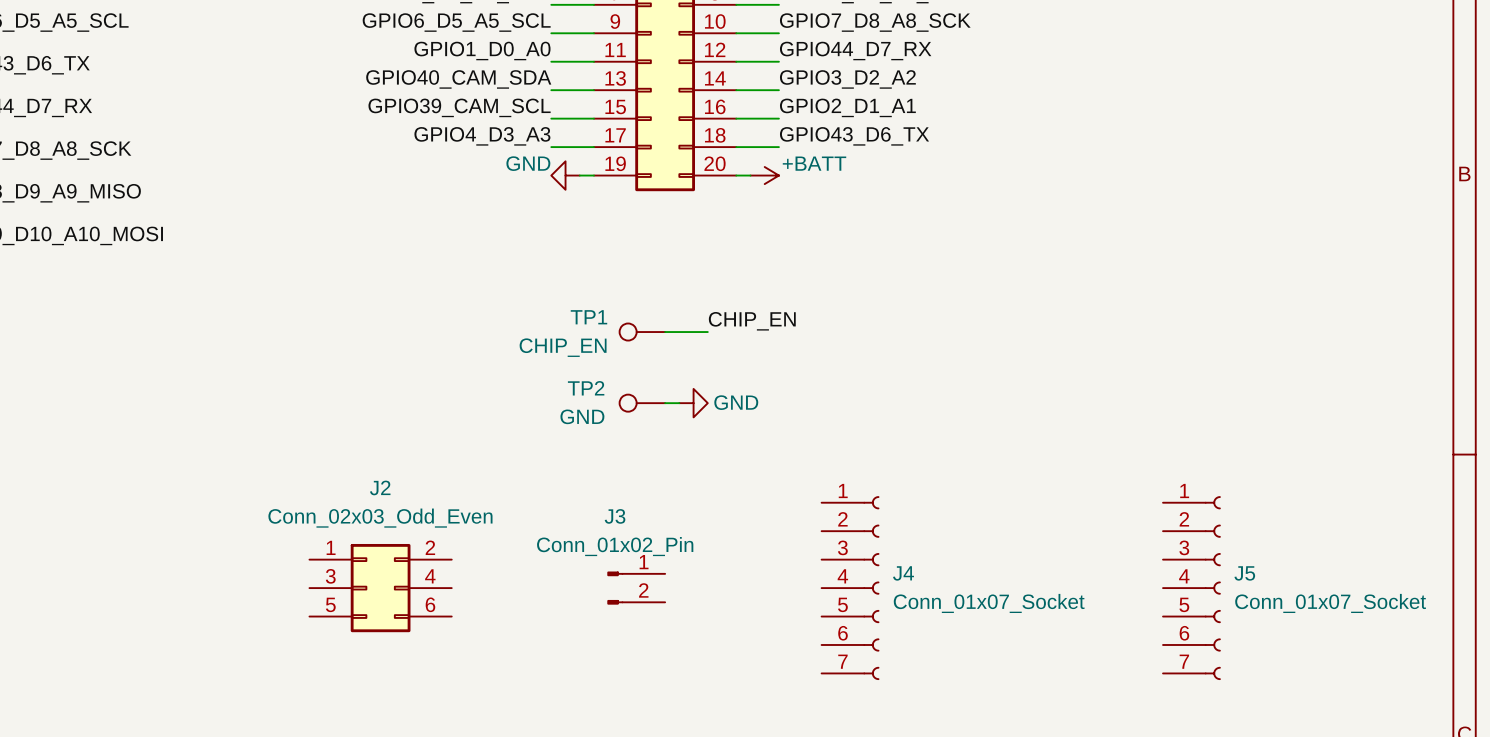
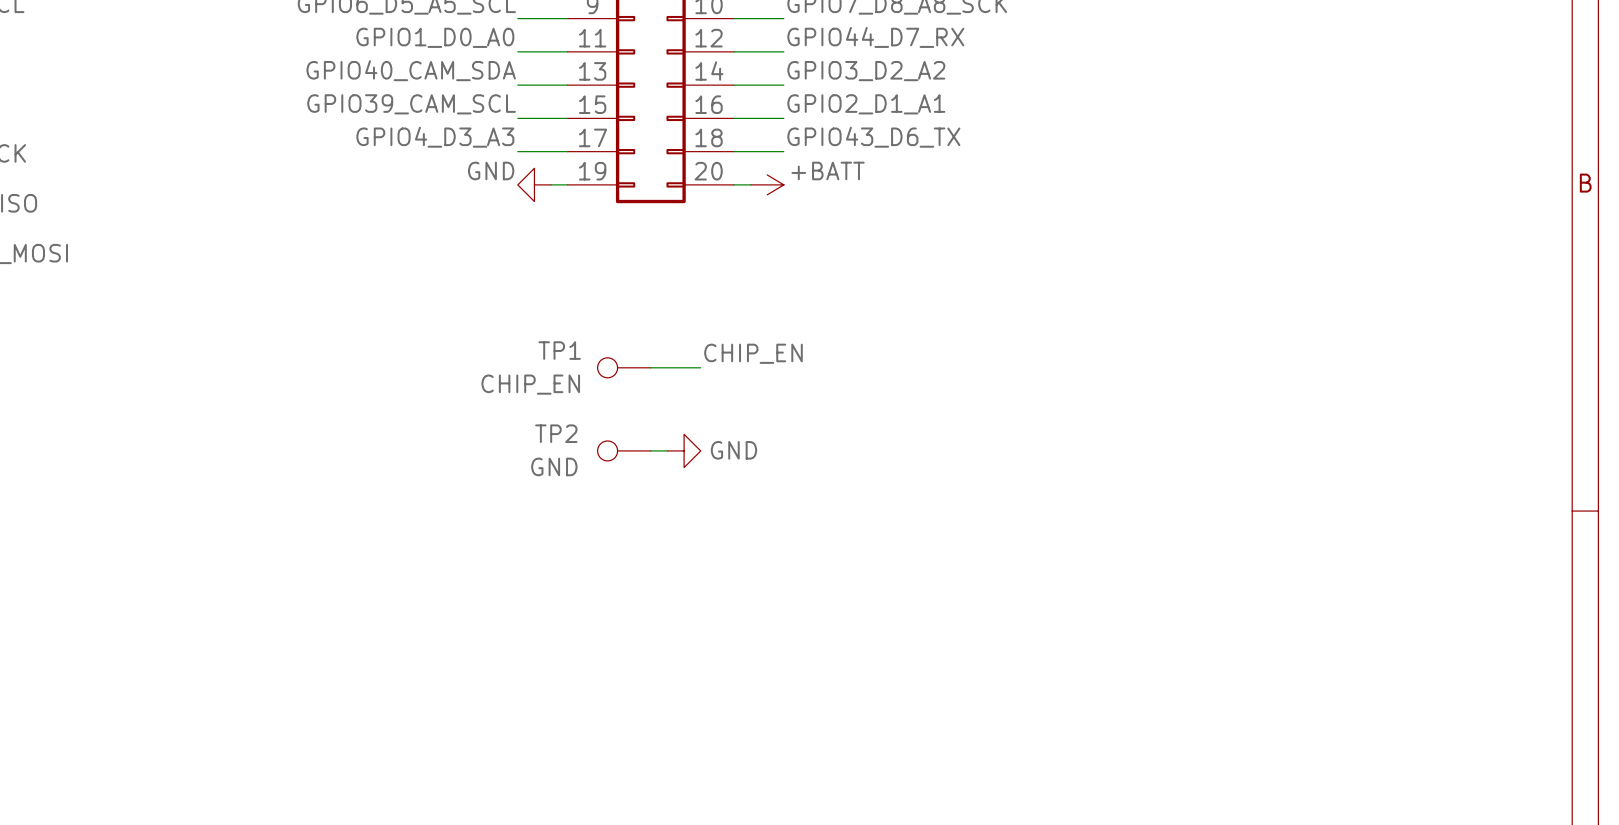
J2: Conn_02x03_Odd_Even (380, 588) -> none
J3: Conn_01x02_Pin (636, 588) -> none
J4: Conn_01x07_Socket (850, 588) -> none
J5: Conn_01x07_Socket (1191, 588) -> none

